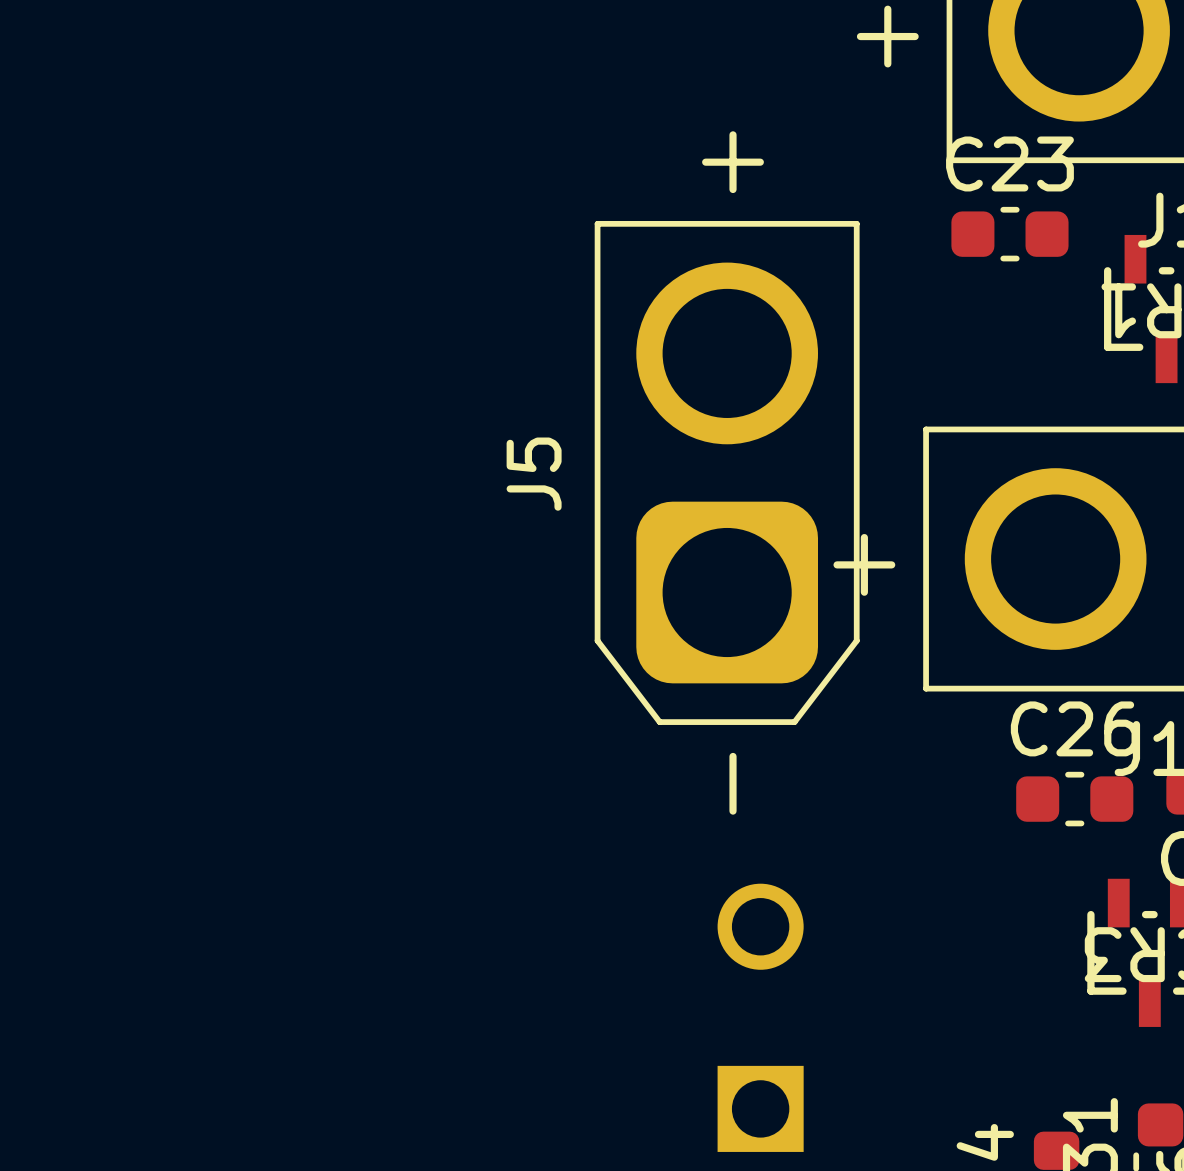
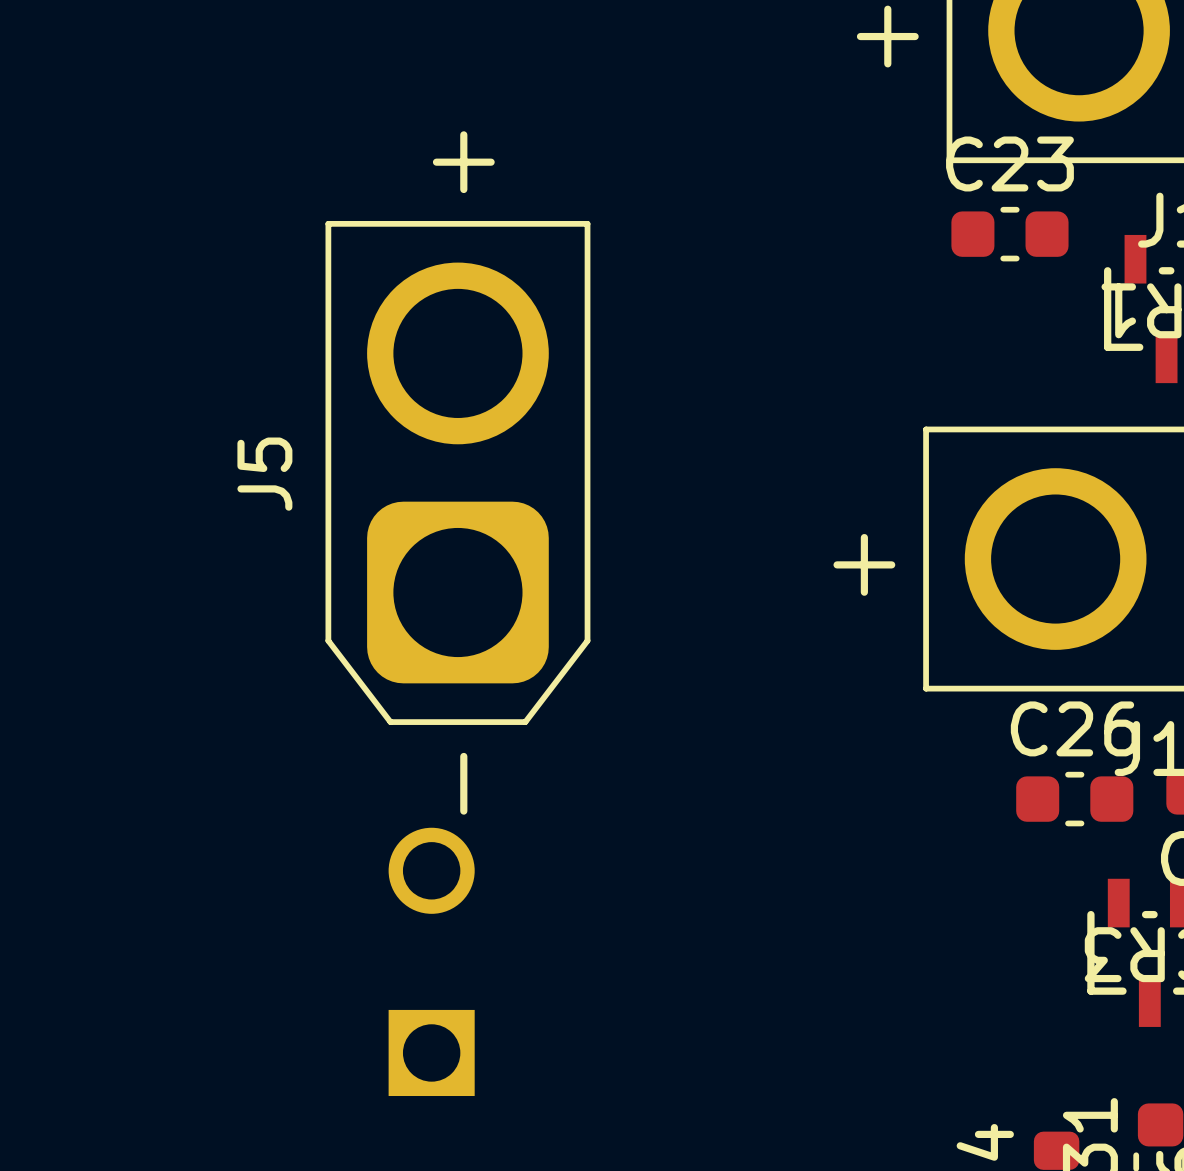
J5 position: (727, 472) -> (457, 472)
part position: (760, 1017) -> (431, 961)

